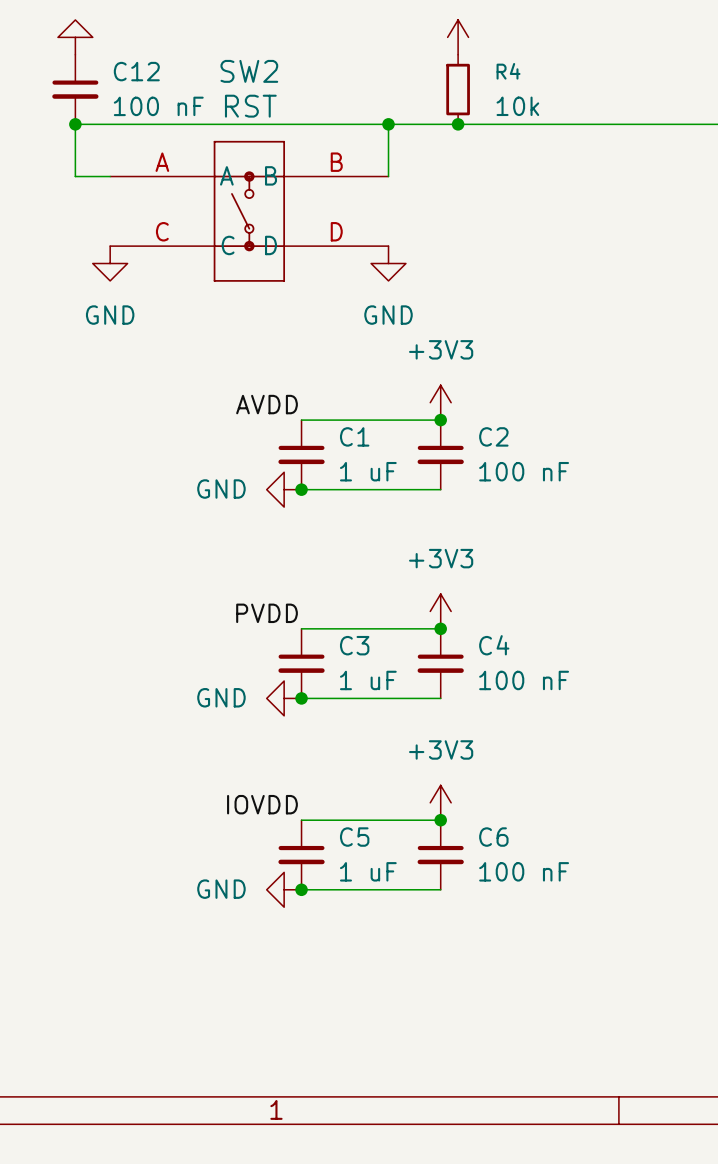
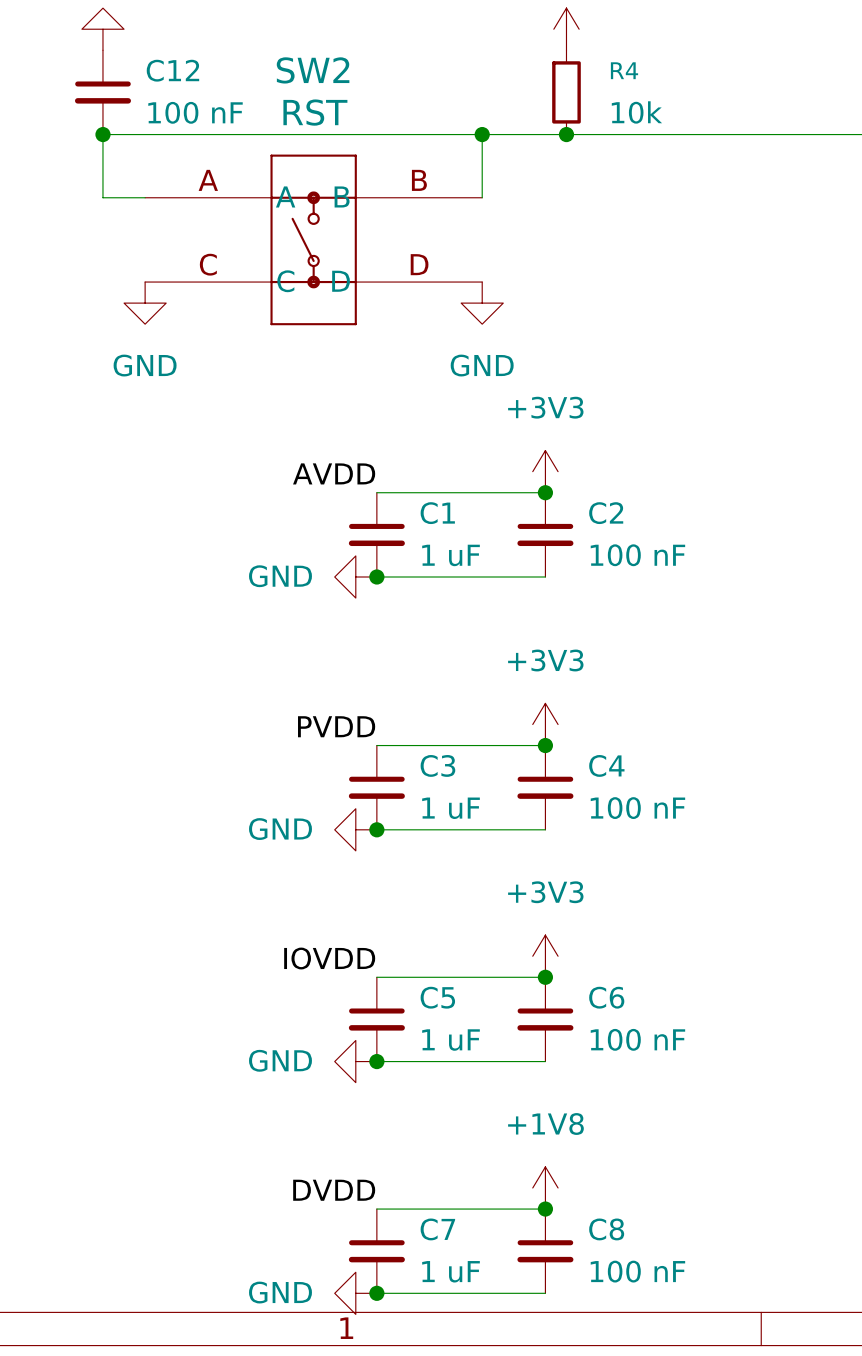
power symbol: none -> +1V8 (545, 1187)
label: none -> DVDD (334, 1190)
wire: none -> (376, 1209) (545, 1209)
junction: none -> (545, 1209)
C7: none -> 1 uF (376, 1251)
C8: none -> 100 nF (545, 1251)
power symbol: none -> GND (355, 1293)
wire: none -> (376, 1293) (545, 1293)
junction: none -> (376, 1293)

